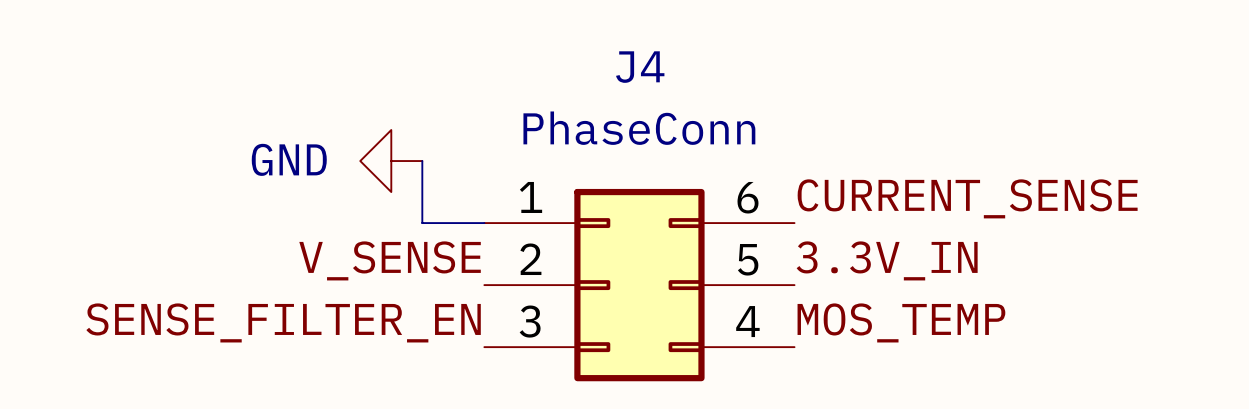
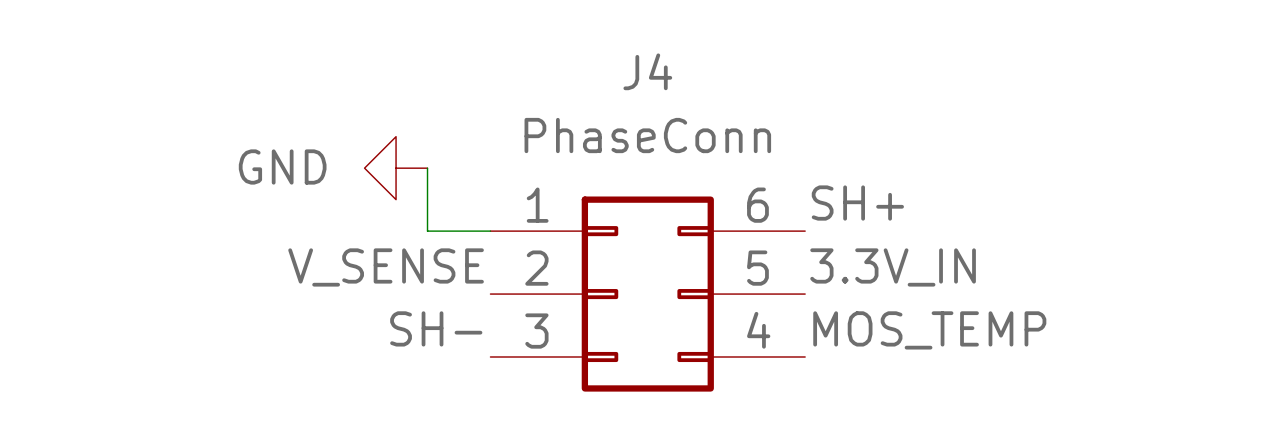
label: CURRENT_SENSE (967, 198) -> SH+ (857, 203)
label: SENSE_FILTER_EN (283, 322) -> SH- (436, 328)

